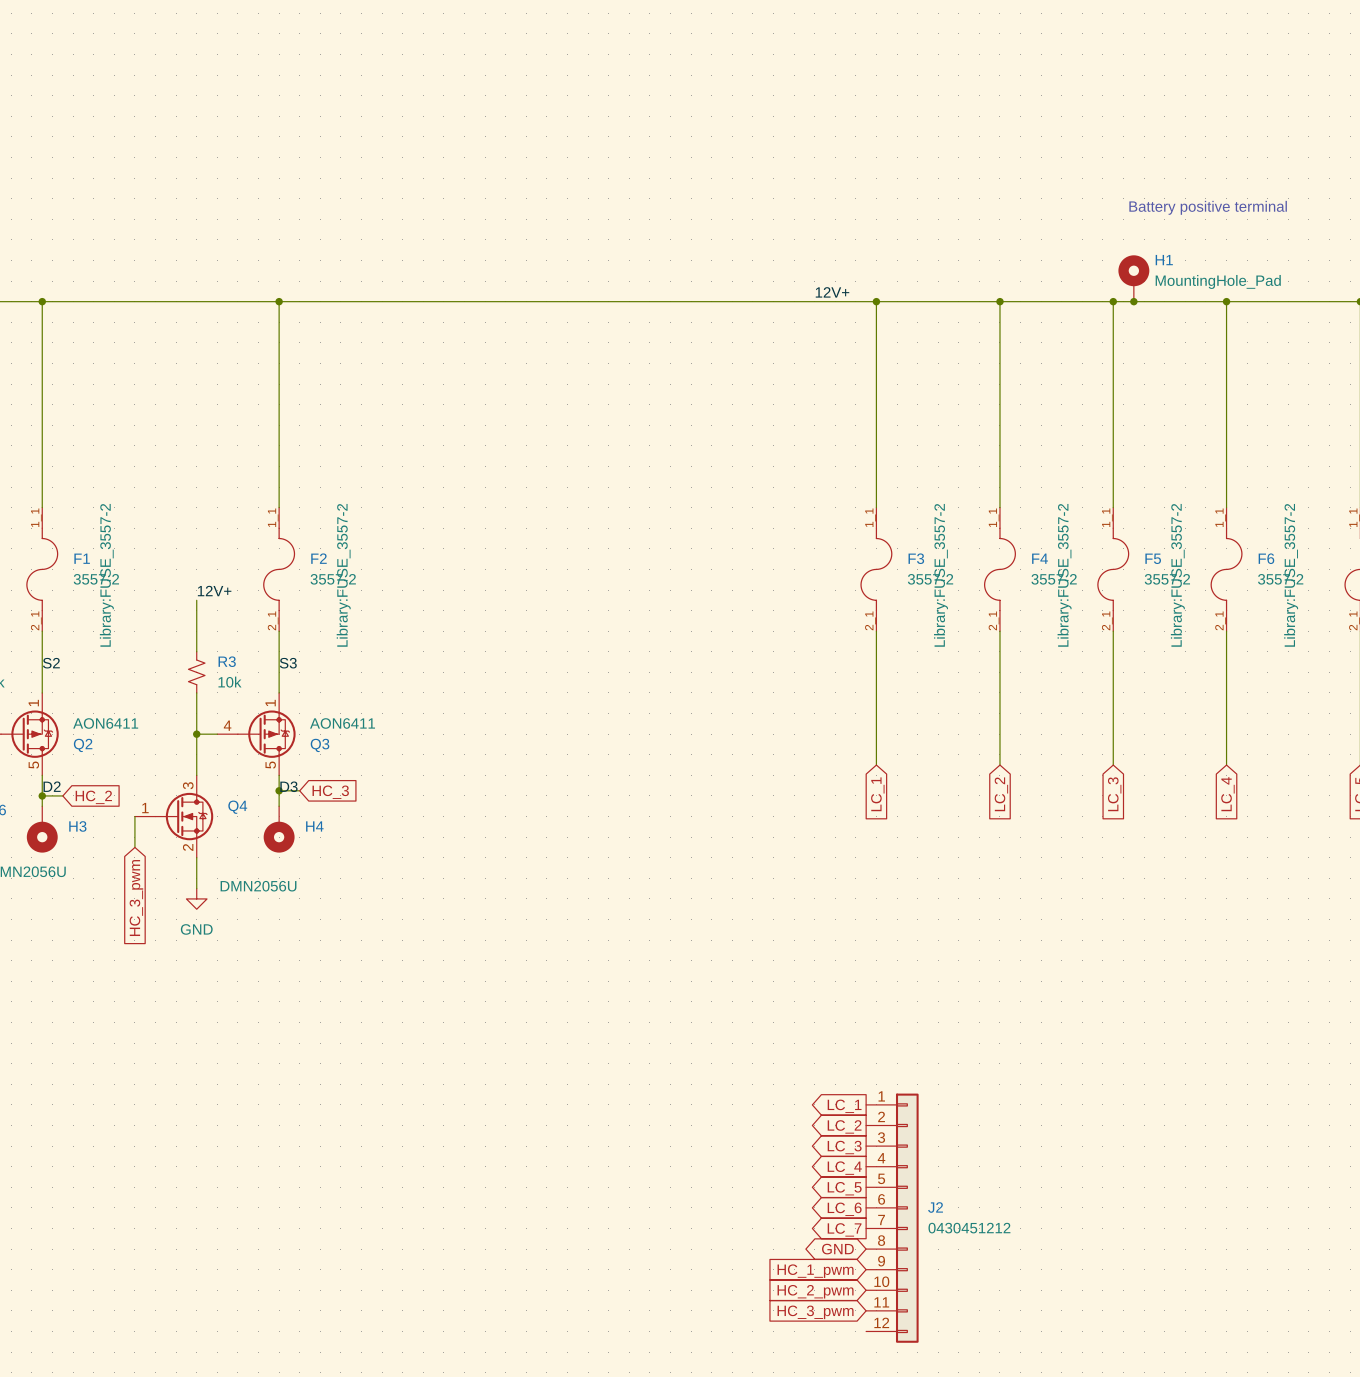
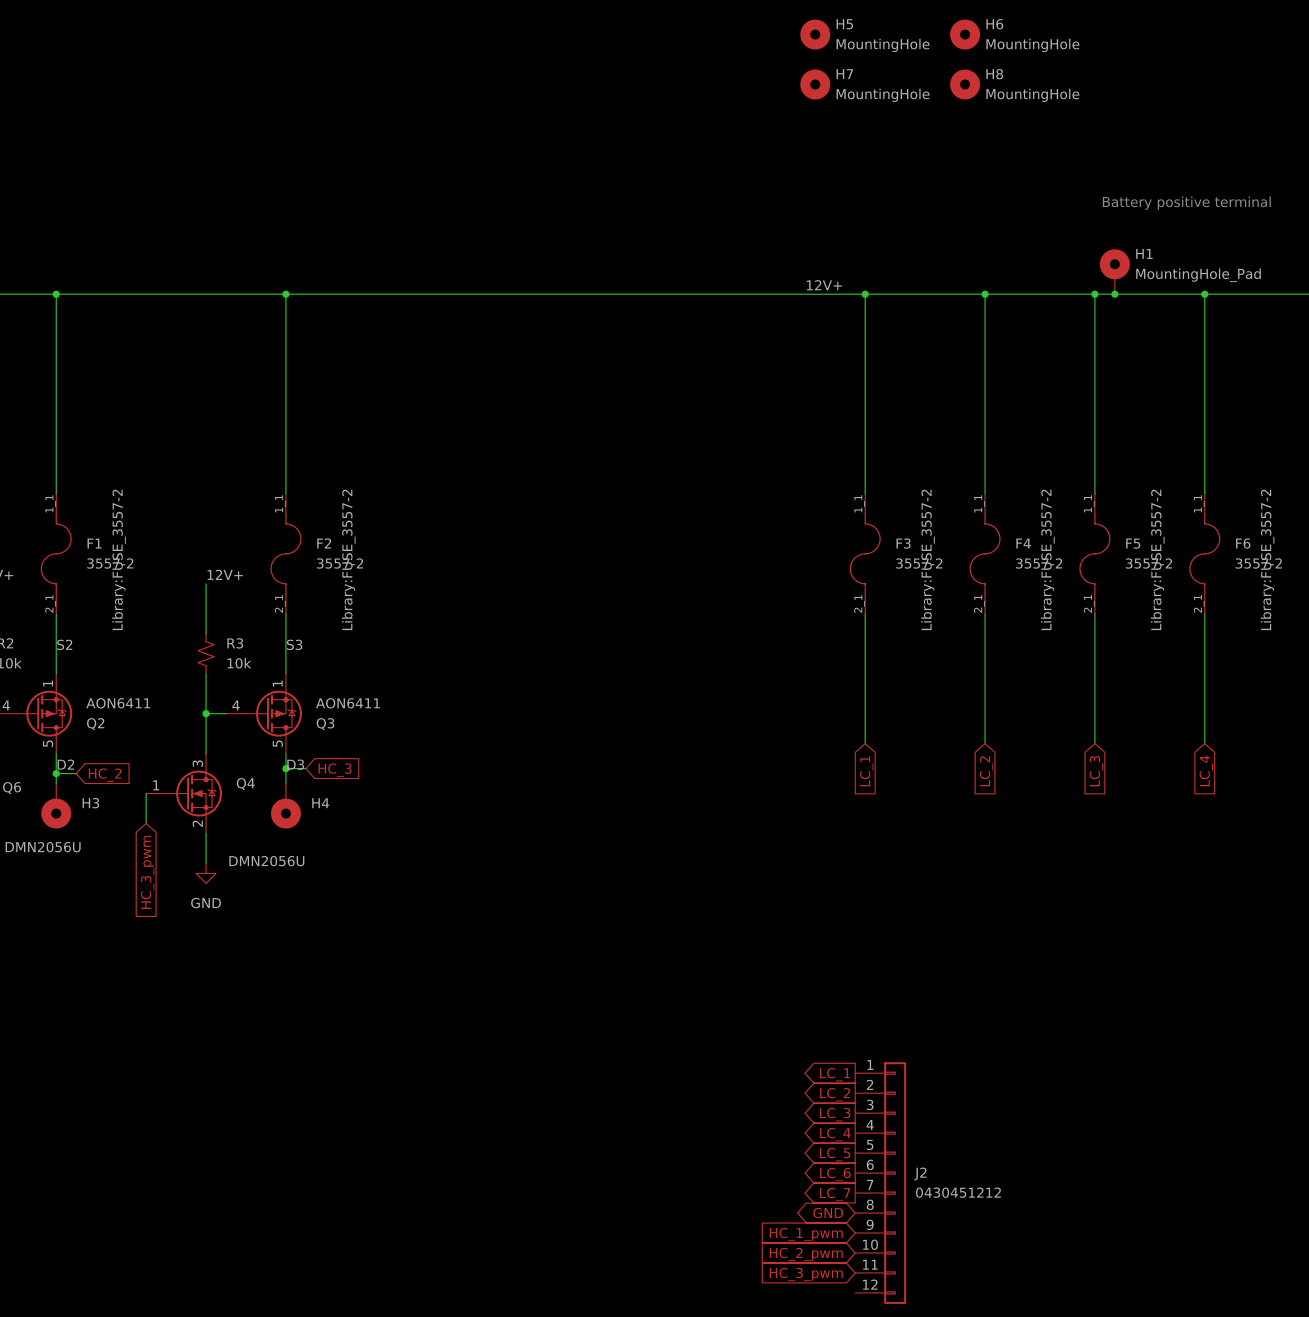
H5: none -> MountingHole (815, 34)
H6: none -> MountingHole (965, 34)
H7: none -> MountingHole (815, 84)
H8: none -> MountingHole (965, 84)

